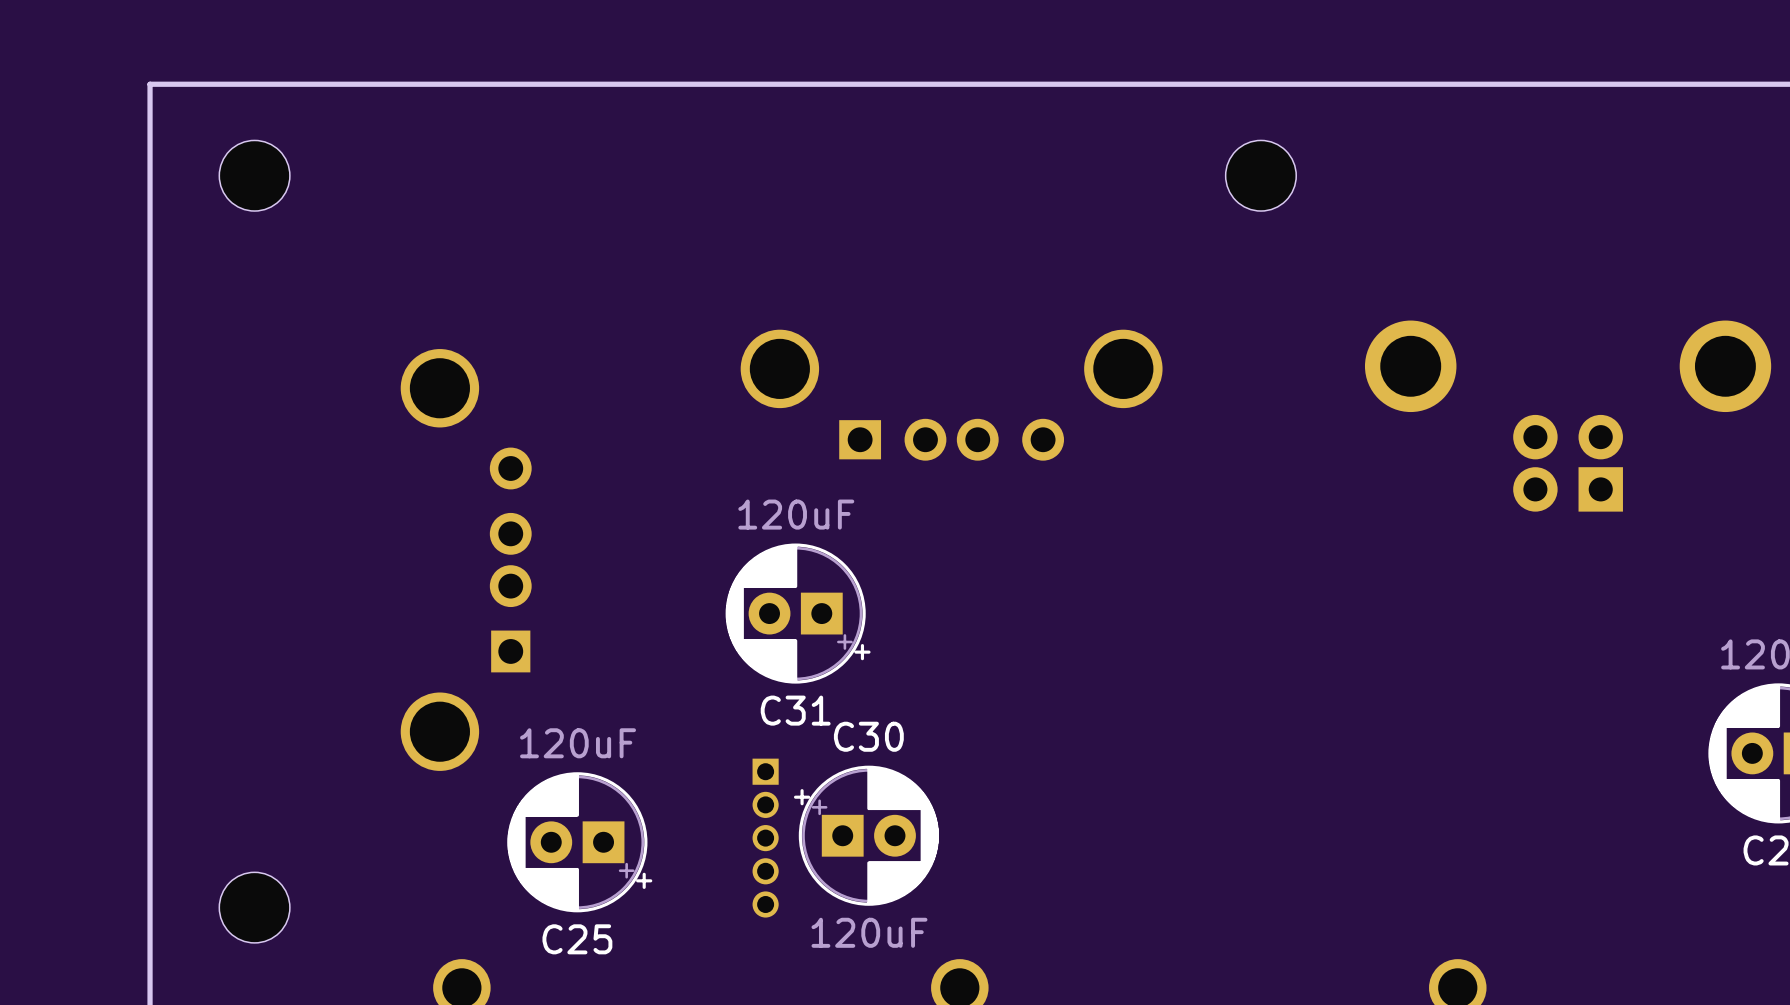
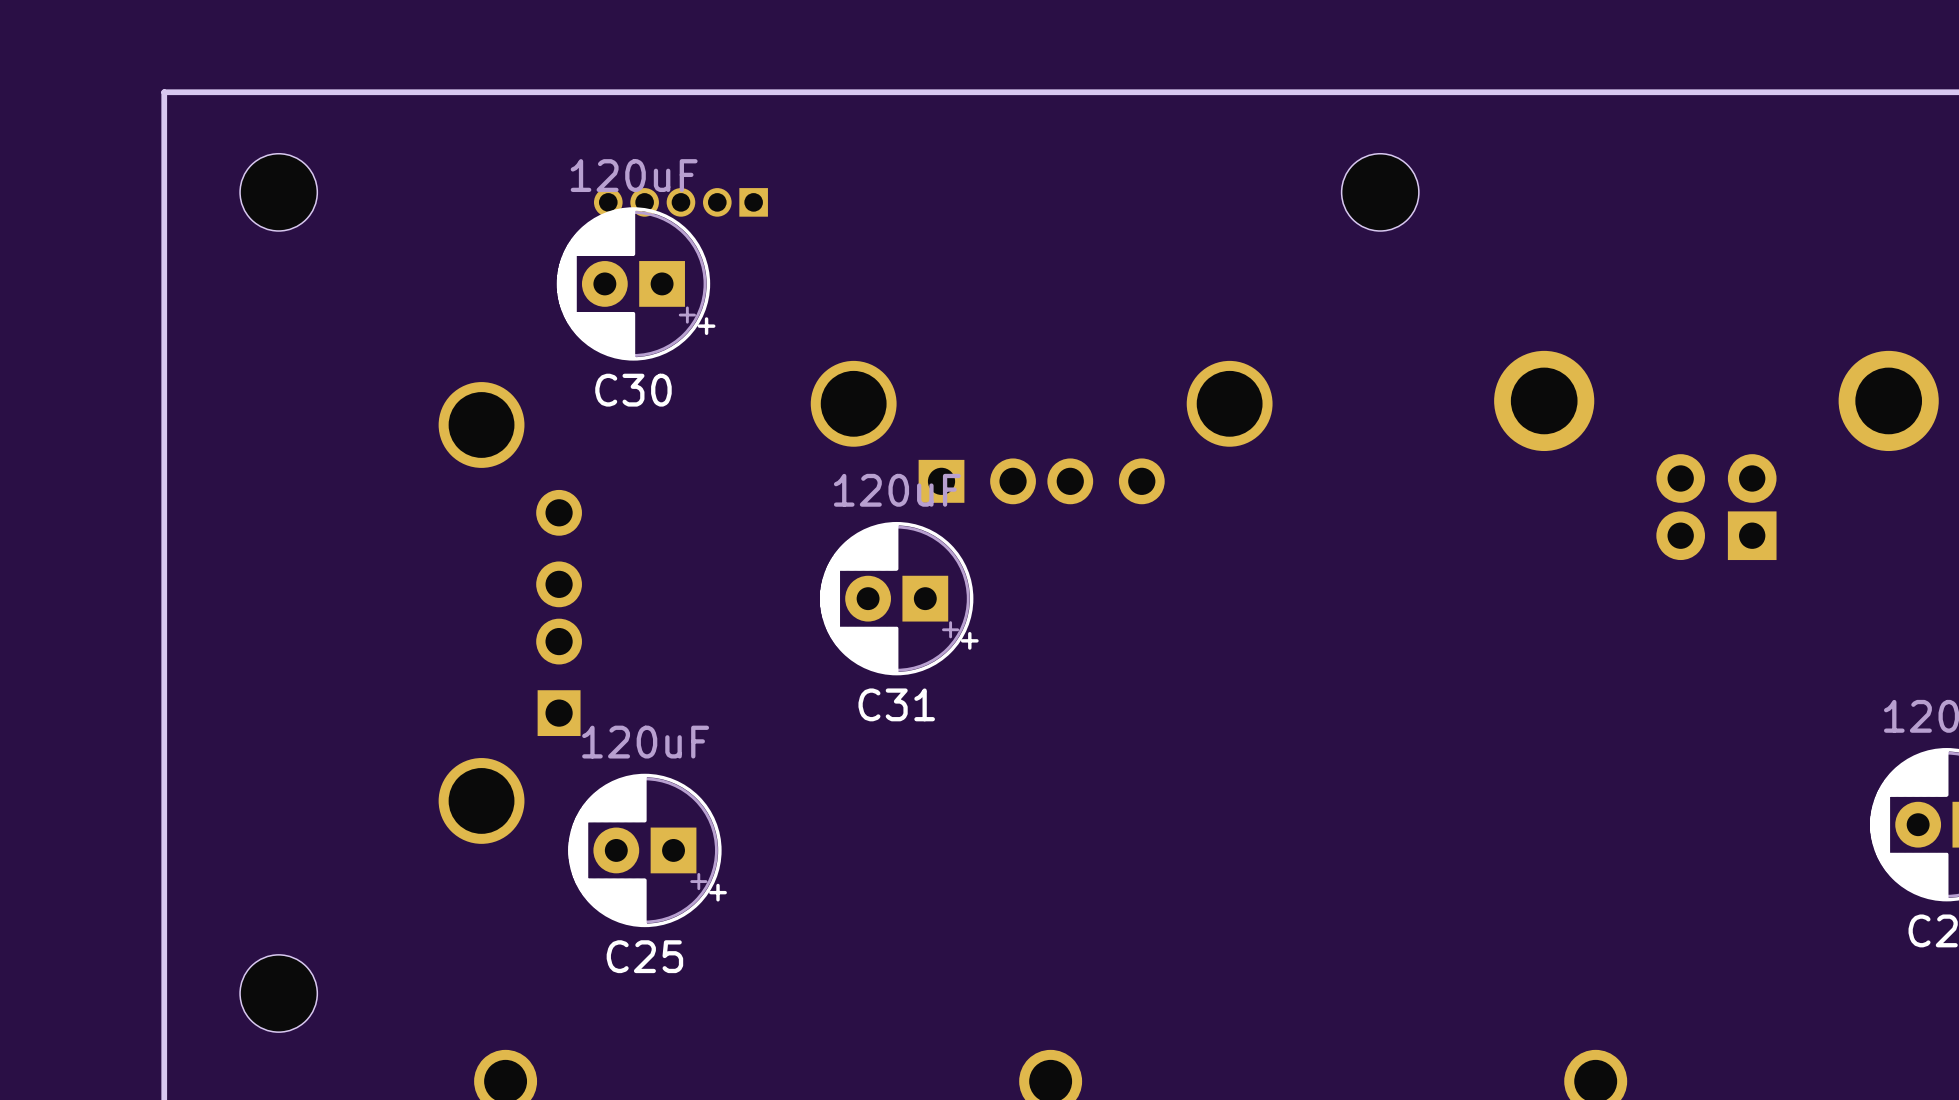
part: none -> (680, 202)
C31 position: (798, 613) -> (899, 598)
C30 rotation: 0° (866, 835) -> 180° (636, 283)
C30 position: (866, 835) -> (636, 283)
part: (765, 838) -> none
C25 position: (579, 842) -> (647, 850)

